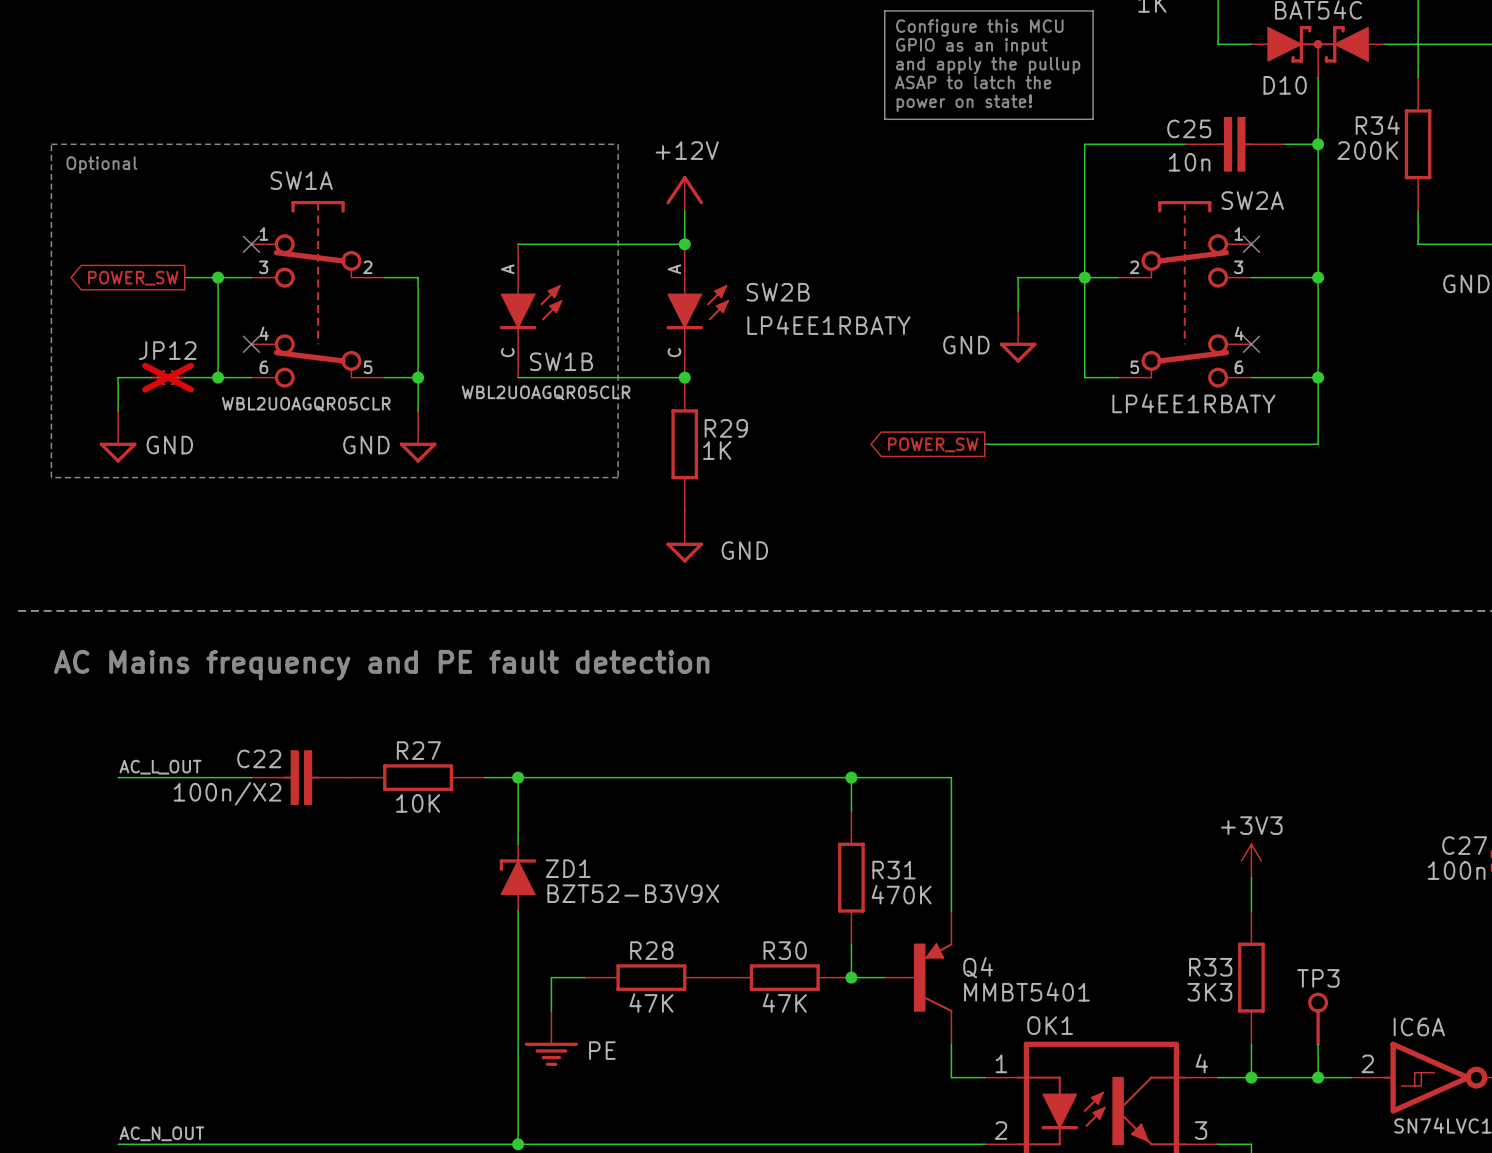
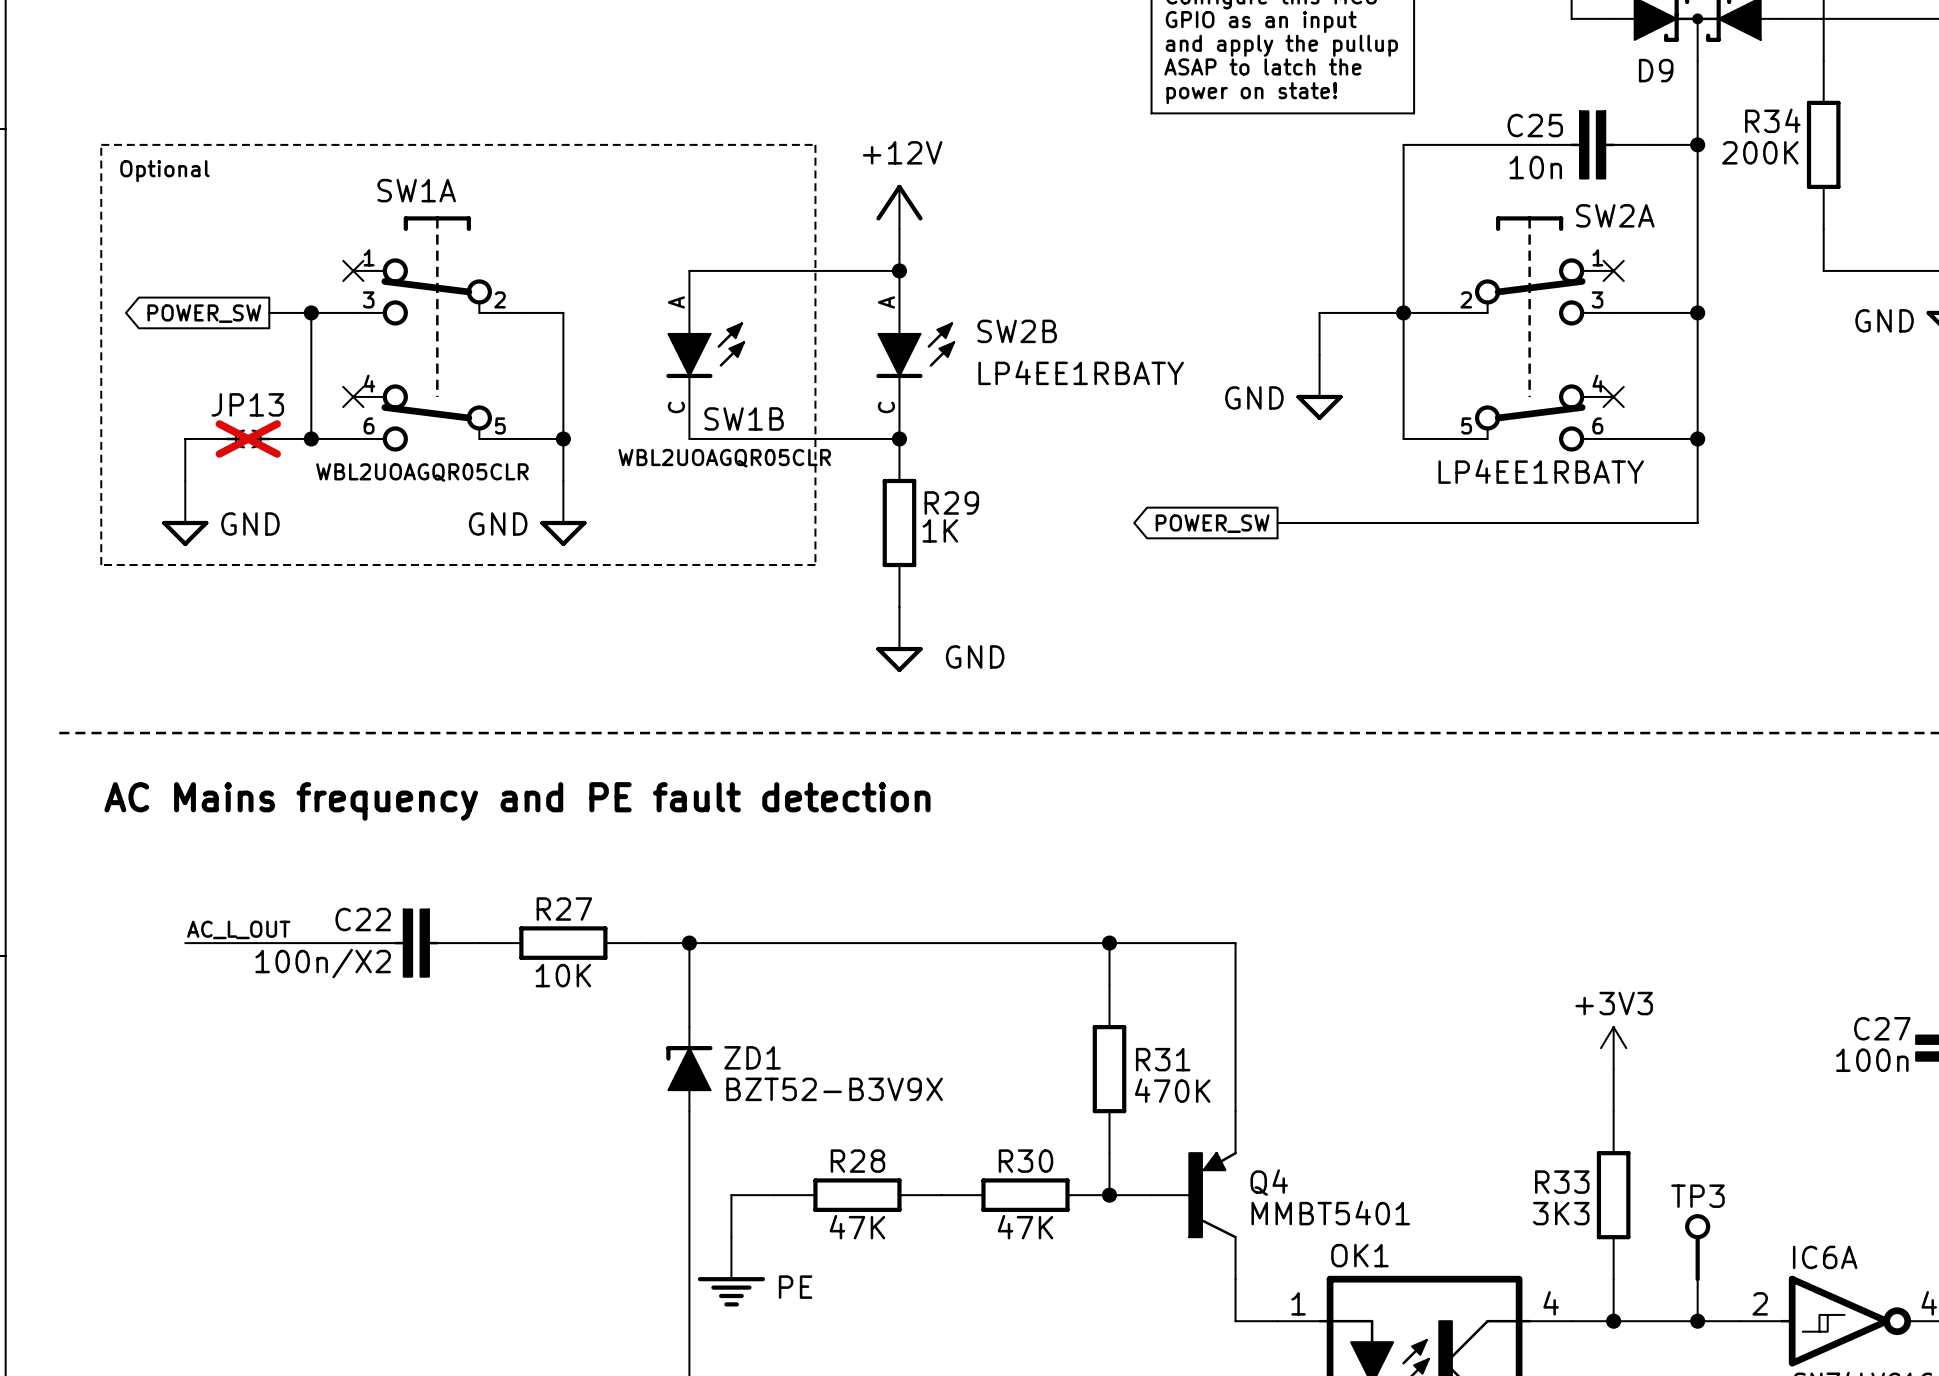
D10 name: D10 (1285, 85) -> D9 (1656, 70)
JP12 name: JP12 (167, 350) -> JP13 (247, 404)

